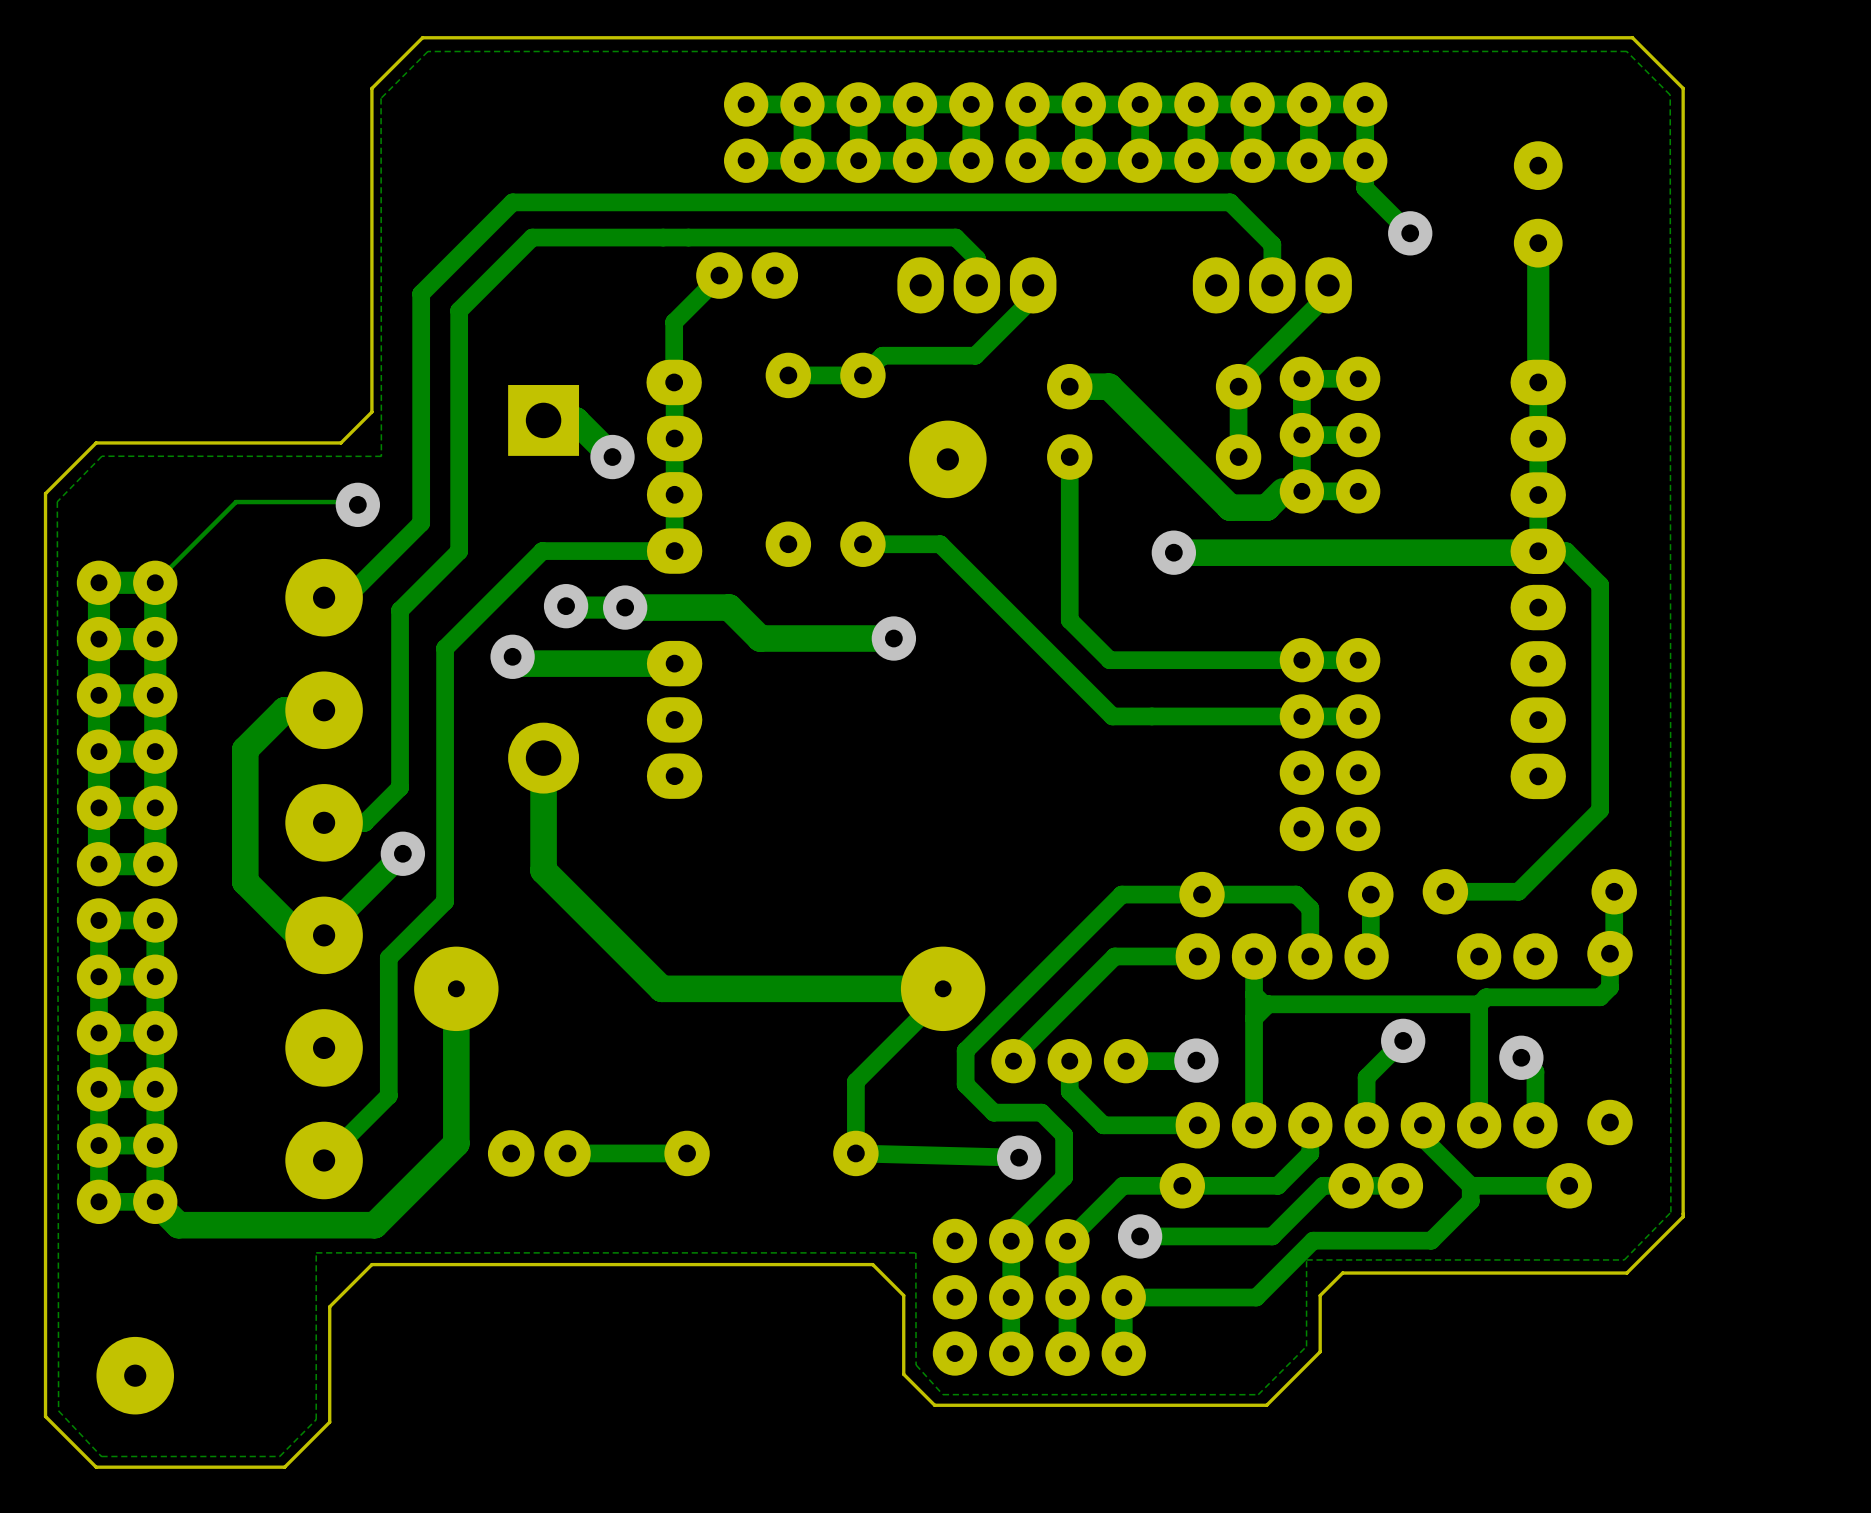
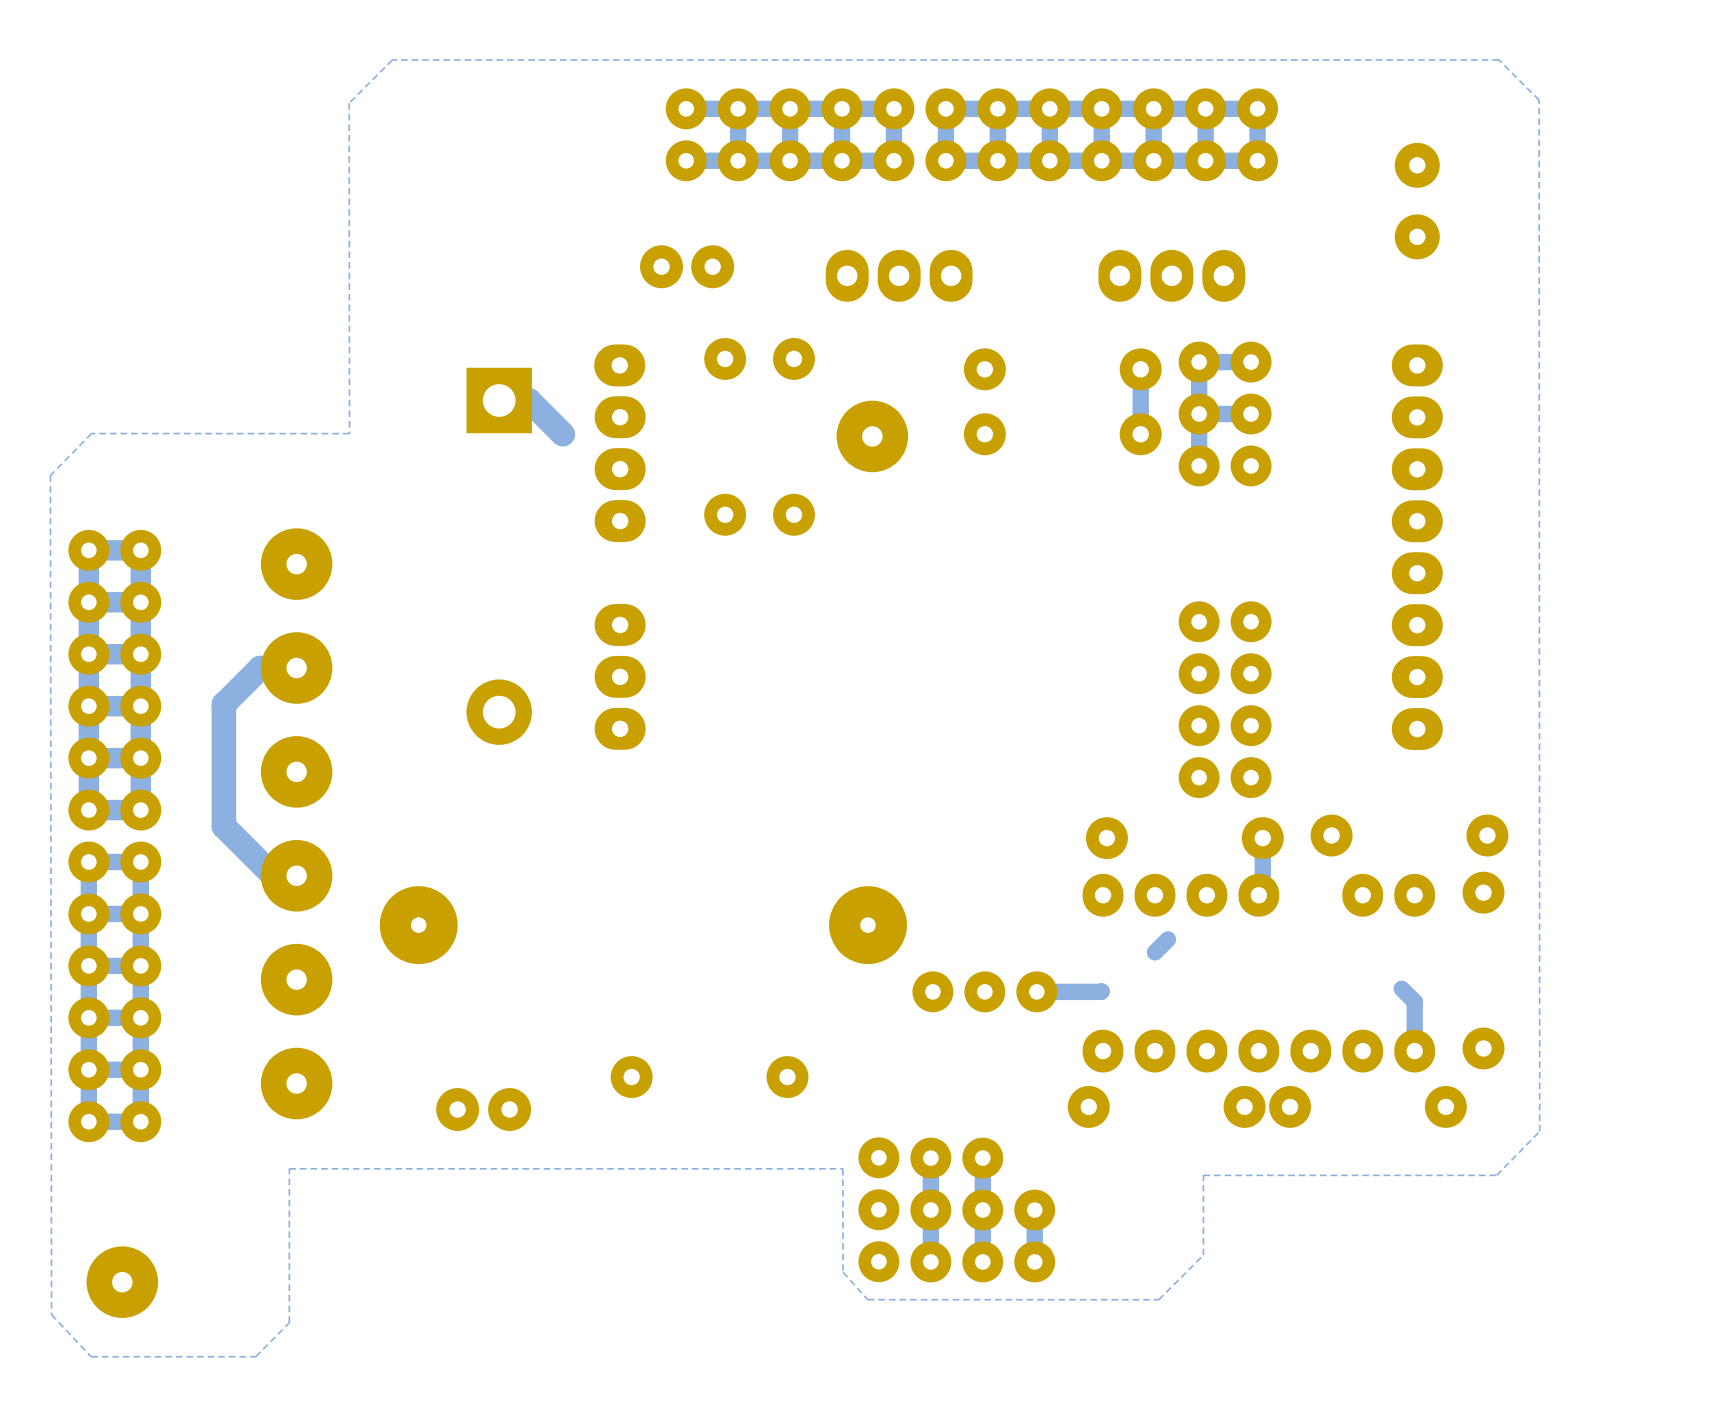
board edge: (1632, 37) (1683, 88) (1683, 1216) (1626, 1273) (1342, 1273) (1320, 1295) (1320, 1351) (1266, 1405) (934, 1405) (903, 1374) (903, 1295) (872, 1264) (371, 1264) (329, 1306) (329, 1422) (284, 1467) (96, 1467) (45, 1416) (45, 493) (96, 442) (340, 442) (371, 412) (371, 88) (422, 37) (1632, 37) -> none
track: (1365, 160) (1365, 188) (1410, 233) -> none
via: (1410, 233) -> none
track: (1538, 243) (1538, 551) -> none
track: (719, 275) (674, 322) (674, 551) (542, 551) (445, 648) (445, 901) (388, 957) (388, 1095) (324, 1160) -> none
track: (976, 285) (976, 258) (955, 237) (532, 237) (459, 310) (459, 551) (400, 610) (400, 787) (364, 822) (324, 822) -> none
track: (1033, 285) (1033, 298) (975, 355) (882, 355) (862, 375) (788, 375) -> none
track: (1272, 285) (1272, 244) (1230, 202) (512, 202) (421, 293) (421, 523) (346, 597) (324, 597) -> none
track: (1328, 285) (1328, 293) (1238, 383) -> none
track: (1069, 386) (1109, 386) (1230, 507) (1266, 507) (1283, 491) (1358, 491) -> none
via: (612, 457) -> none
track: (1069, 457) (1069, 620) (1109, 660) (1358, 660) -> none
track: (357, 504) (355, 502) (236, 502) (155, 582) -> none
via: (357, 504) -> none
track: (862, 544) (940, 544) (1112, 716) (1358, 716) -> none
track: (1538, 551) (1173, 552) -> none
track: (1538, 551) (1566, 551) (1600, 585) (1600, 810) (1518, 891) (1445, 891) -> none
via: (1173, 552) -> none
track: (566, 606) (729, 607) (760, 638) (893, 638) -> none
via: (566, 606) -> none
via: (625, 607) -> none
via: (893, 638) -> none
track: (512, 656) (519, 663) (674, 663) -> none
via: (512, 656) -> none
track: (543, 758) (543, 870) (661, 988) (943, 988) (943, 994) (855, 1081) (855, 1153) (1019, 1157) -> none
track: (402, 853) (324, 932) (324, 935) -> none
via: (402, 853) -> none
track: (1614, 891) (1614, 949) (1610, 953) (1610, 987) (1600, 997) (1486, 997) (1479, 1004) -> none
track: (1197, 956) (1114, 956) (1013, 1057) (1013, 1061) -> none
track: (1254, 956) (1254, 1125) -> none
track: (1310, 956) (1310, 908) (1296, 894) (1121, 894) (965, 1050) (965, 1084) (993, 1112) (1041, 1112) (1064, 1135) (1064, 1177) (1011, 1230) (1011, 1241) -> none
track: (456, 988) (456, 1143) (374, 1225) (178, 1225) (155, 1201) -> none
track: (1254, 994) (1263, 1004) (1479, 1004) -> none
track: (1479, 1004) (1479, 1125) -> none
track: (1403, 1040) (1366, 1077) (1366, 1125) -> none
via: (1403, 1040) -> none
via: (1521, 1057) -> none
via: (1196, 1060) -> none
track: (1069, 1061) (1069, 1091) (1103, 1125) (1197, 1125) -> none
track: (1310, 1125) (1310, 1153) (1277, 1185) (1122, 1185) (1067, 1241) -> none
track: (1422, 1125) (1422, 1137) (1470, 1185) -> none
part position: (539, 1153) -> (483, 1109)
track: (687, 1153) (567, 1153) -> none
via: (1019, 1157) -> none
track: (1400, 1185) (1322, 1185) (1272, 1236) (1140, 1236) -> none
track: (1470, 1185) (1470, 1201) (1431, 1240) (1313, 1240) (1256, 1297) (1123, 1297) -> none
track: (1569, 1185) (1470, 1185) -> none
via: (1140, 1236) -> none

